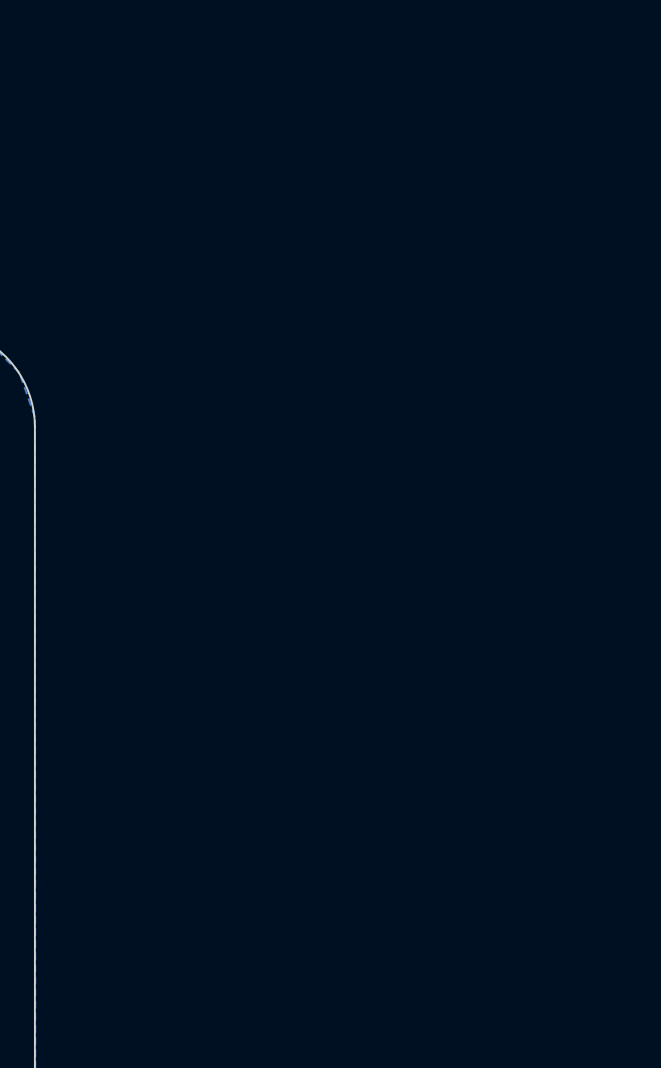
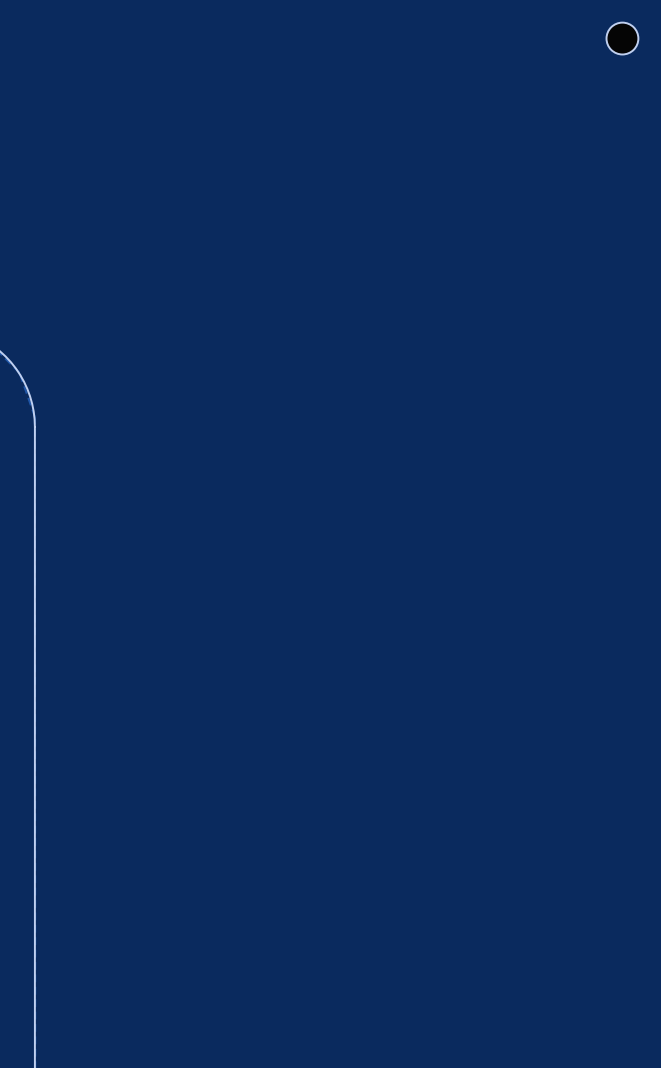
part: none -> (622, 38)

